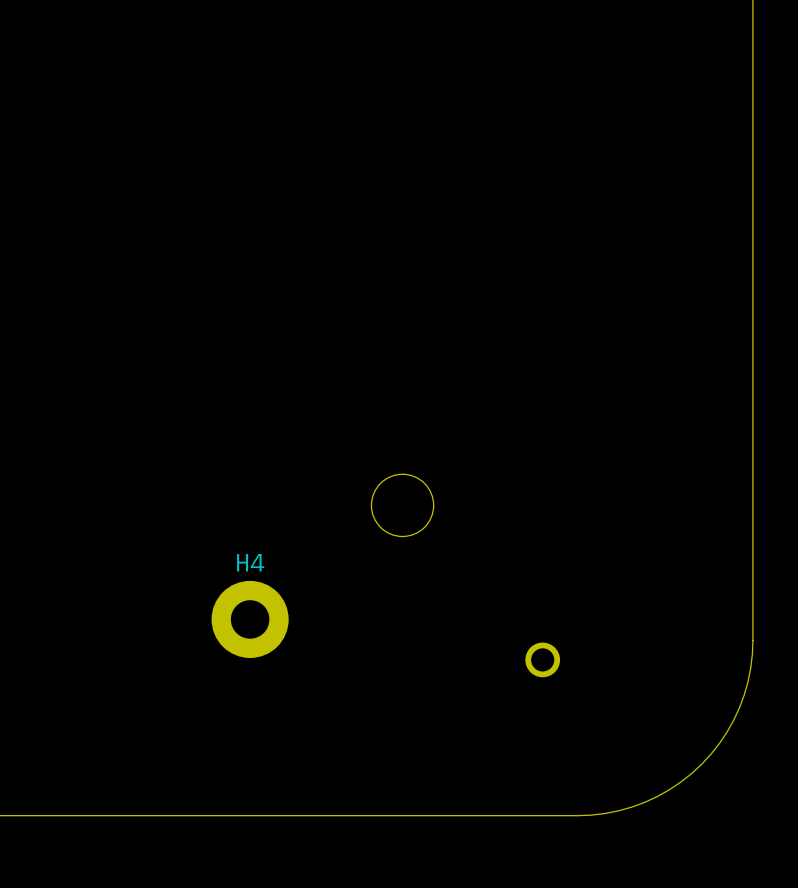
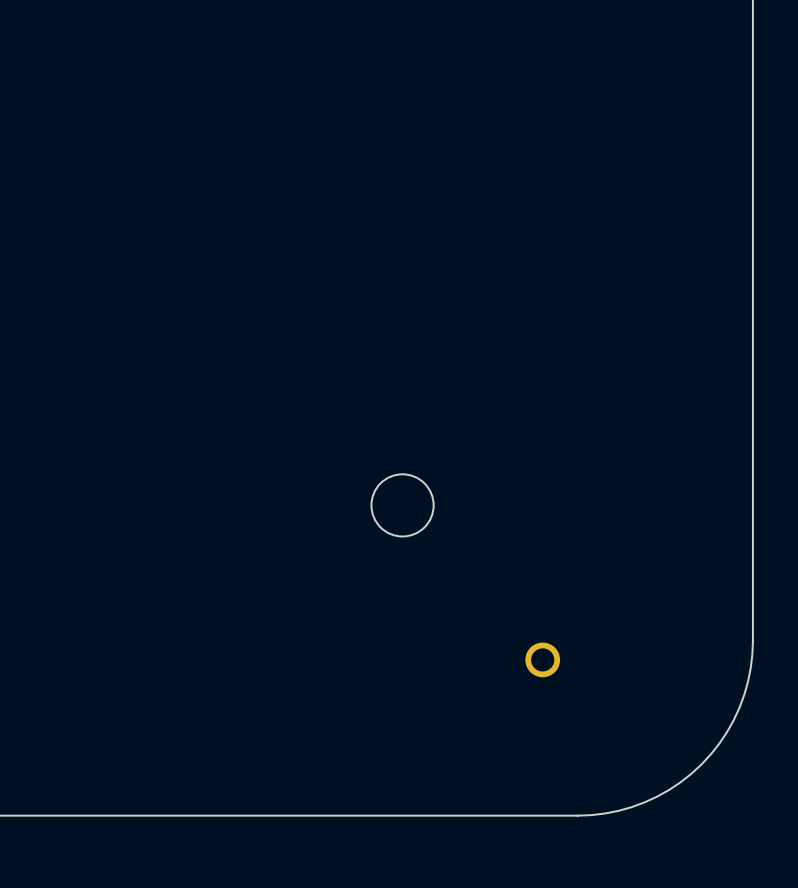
H4: (250, 619) -> none

